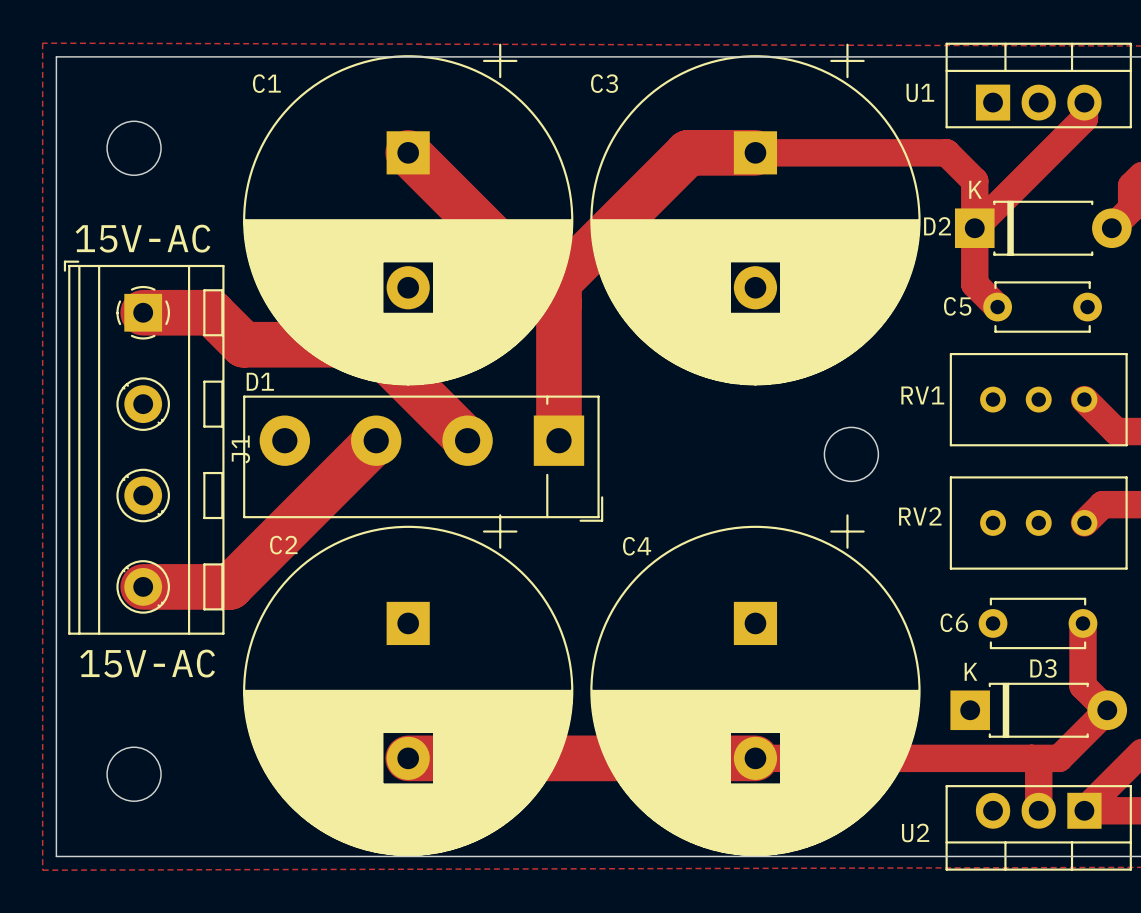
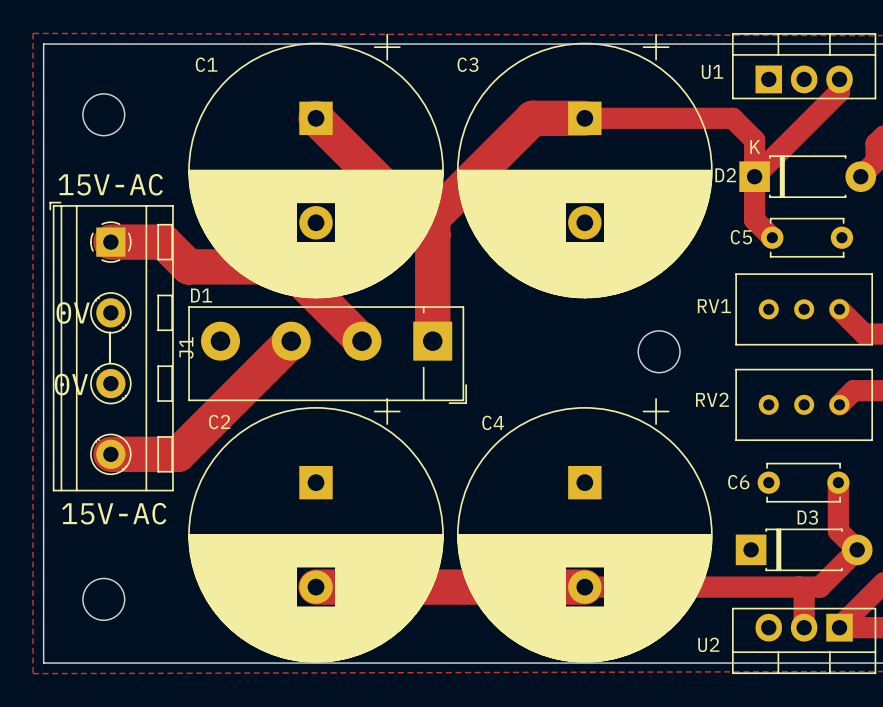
text: none -> 0V (73, 312)
line: none -> (109, 332) (109, 362)
text: none -> 0V (71, 384)
D3 text: K (971, 671) -> none

